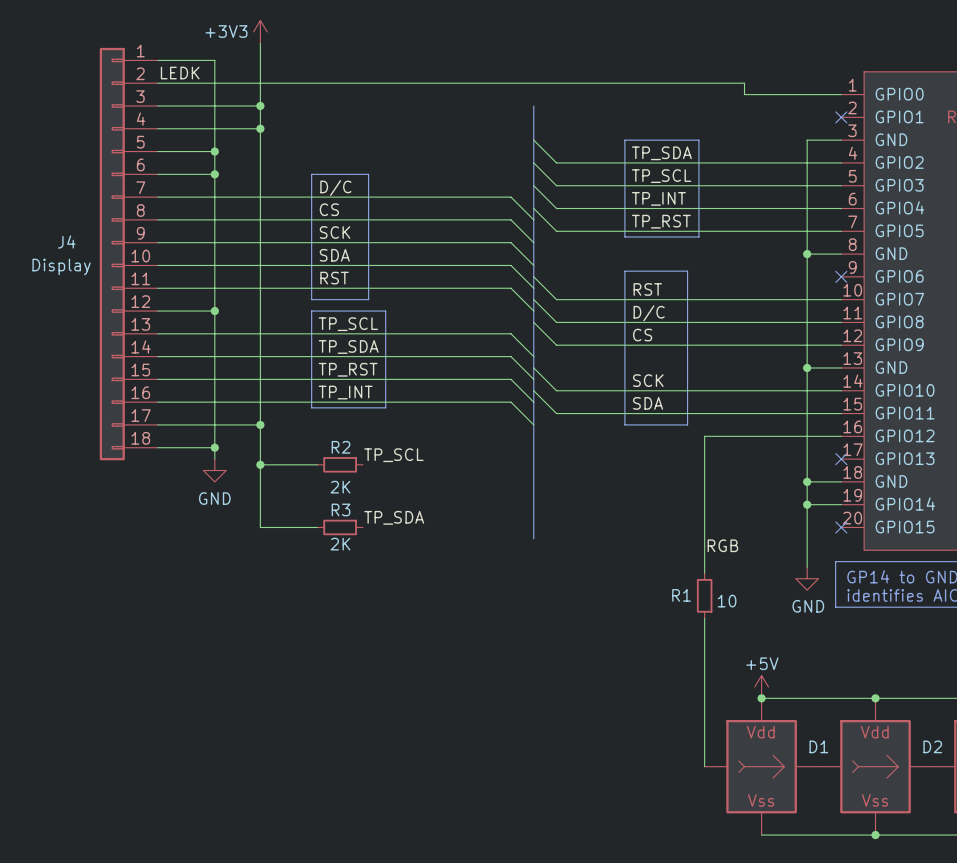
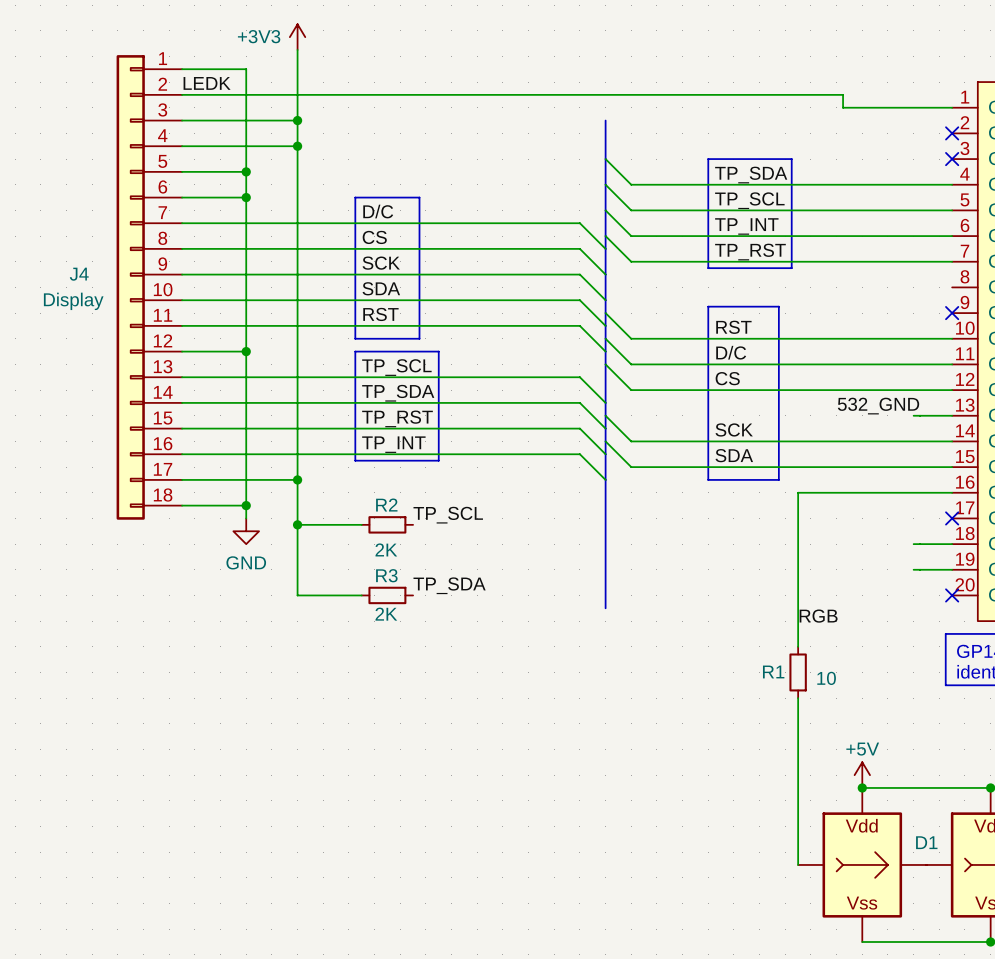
wire: (841, 140) (807, 140) (807, 567) -> none
no-connect mark: none -> (952, 159)
wire: (807, 254) (841, 254) -> none
junction: (807, 254) -> none
label: none -> 532_GND (878, 406)
junction: (807, 367) -> none
junction: (807, 481) -> none
junction: (807, 504) -> none
power symbol: GND (807, 578) -> none

